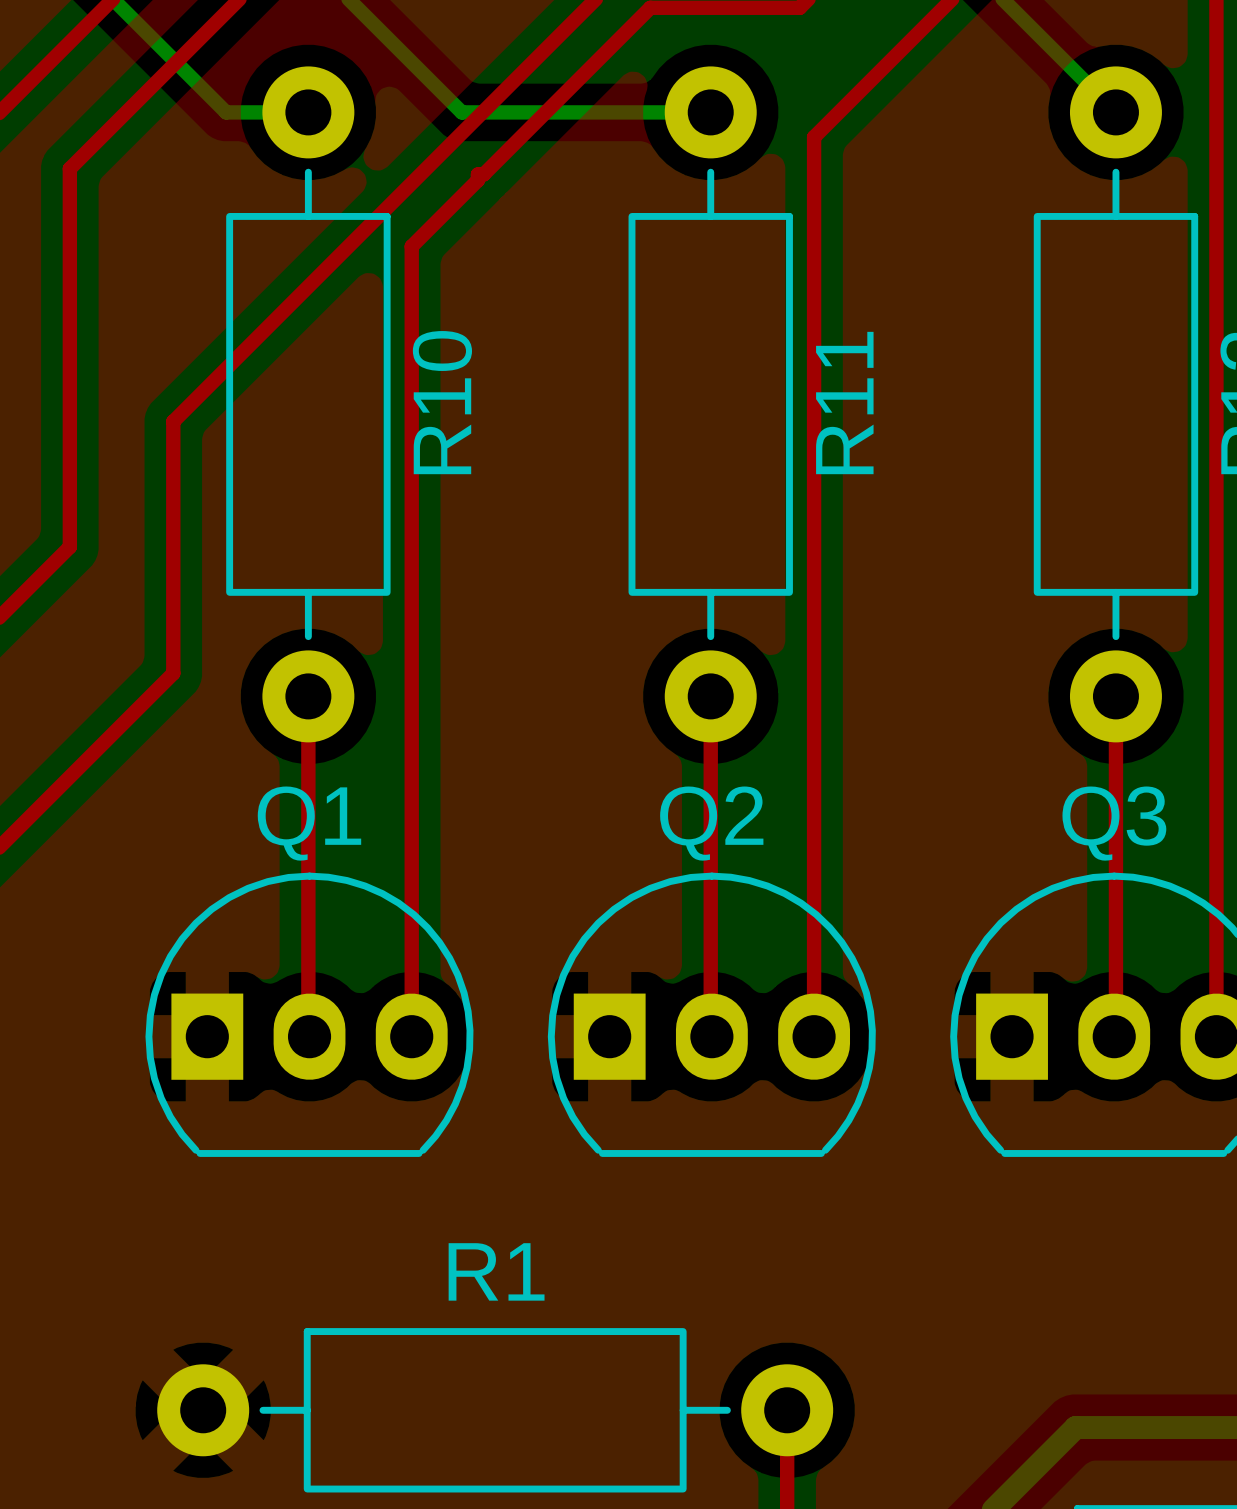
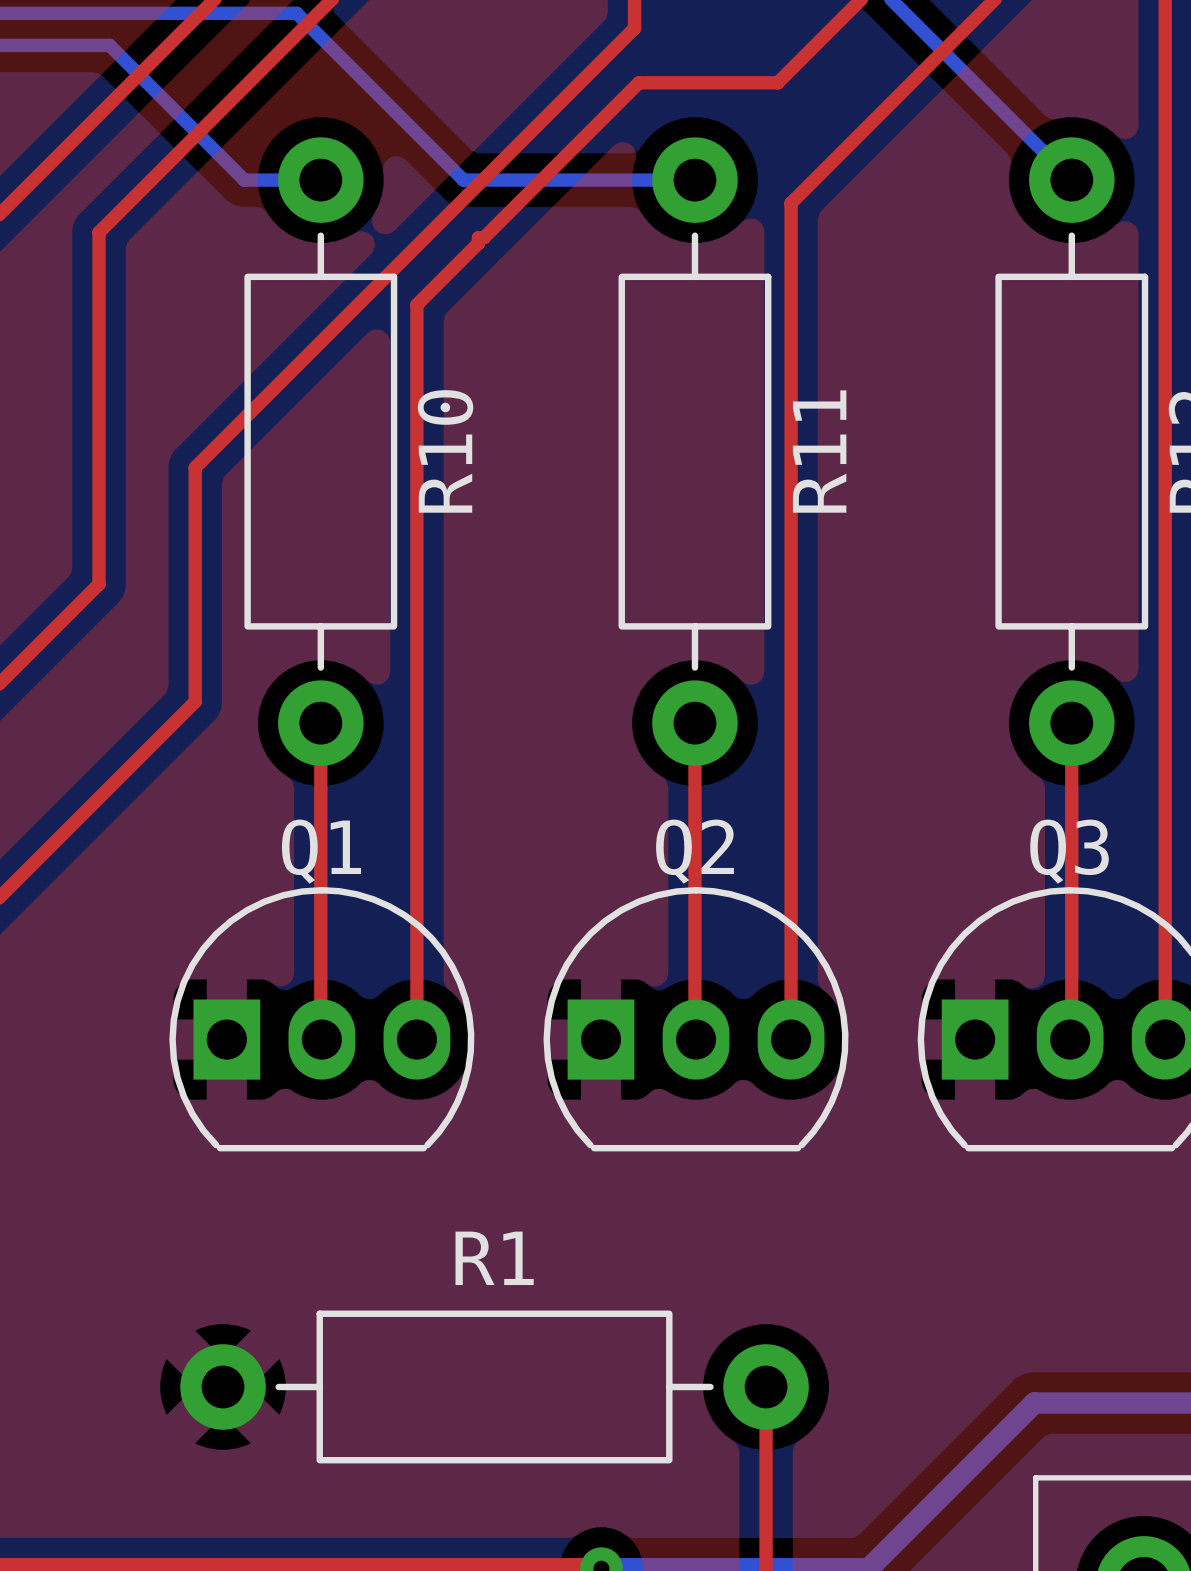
Q1 name position: Q1 (309, 823) -> Q1 (321, 851)
Q2 name position: Q2 (711, 823) -> Q2 (695, 851)
Q3 name position: Q3 (1114, 823) -> Q3 (1069, 851)

